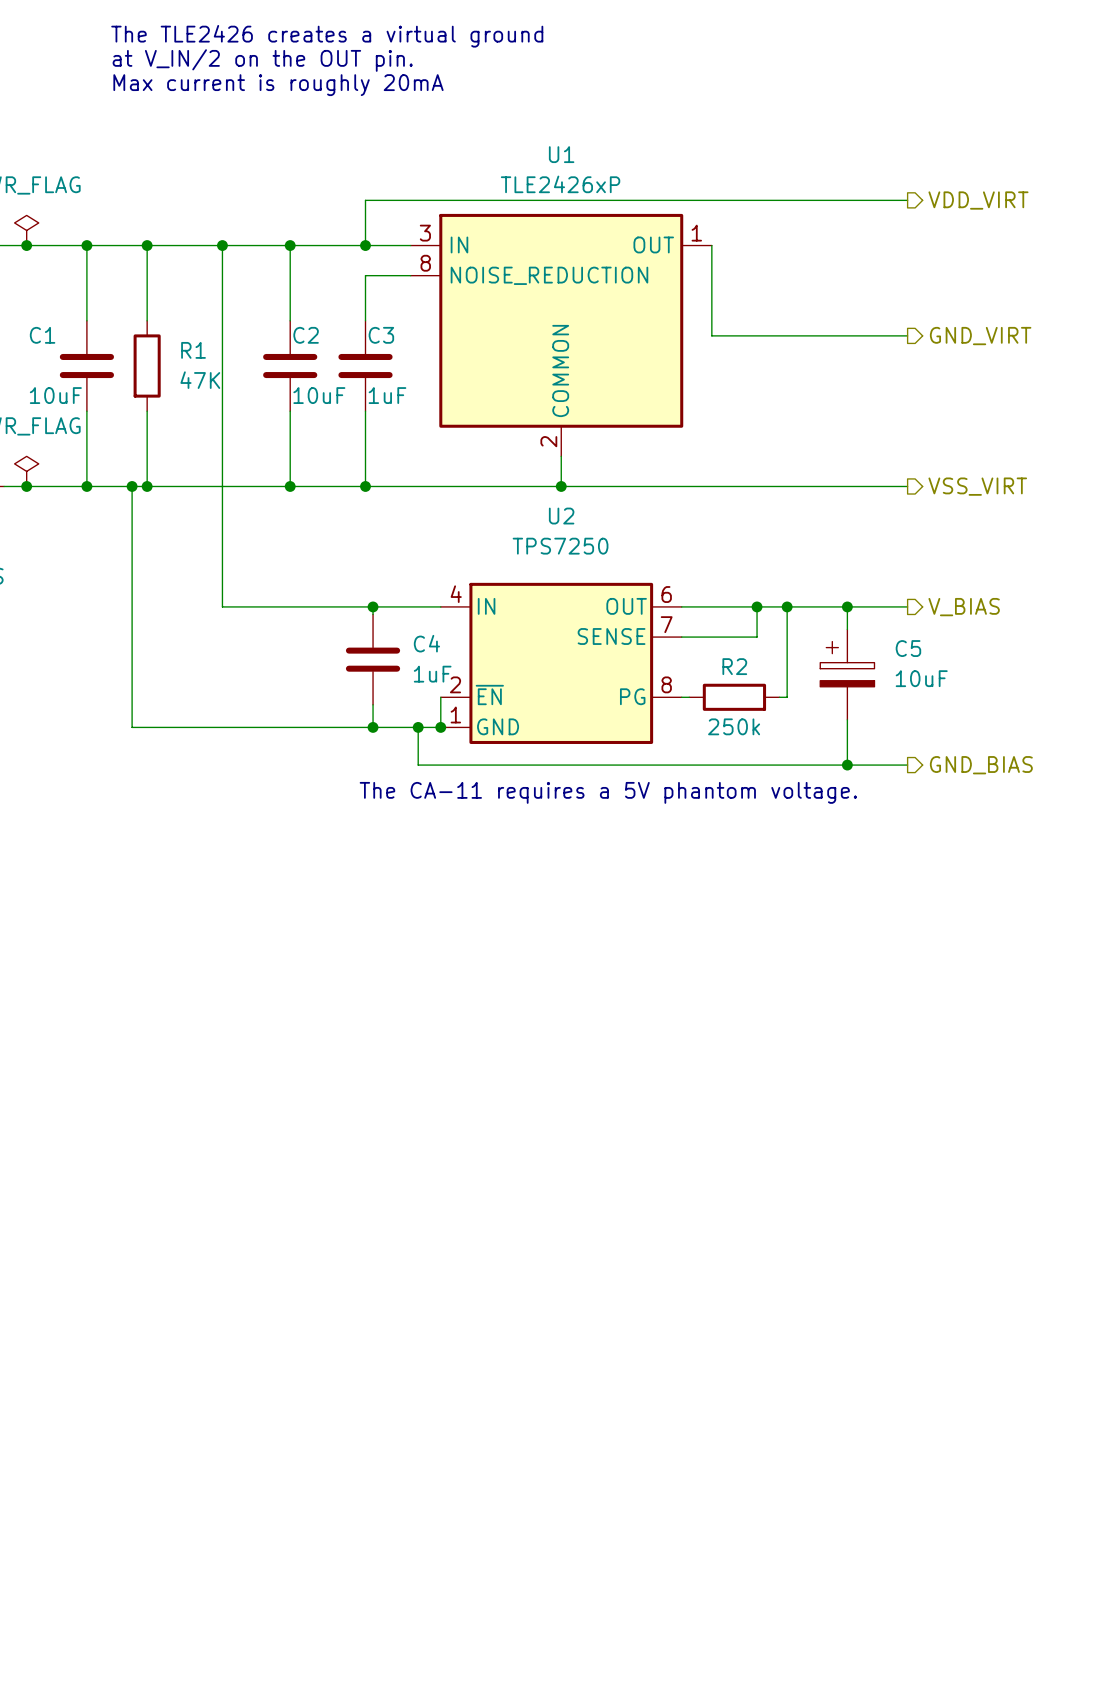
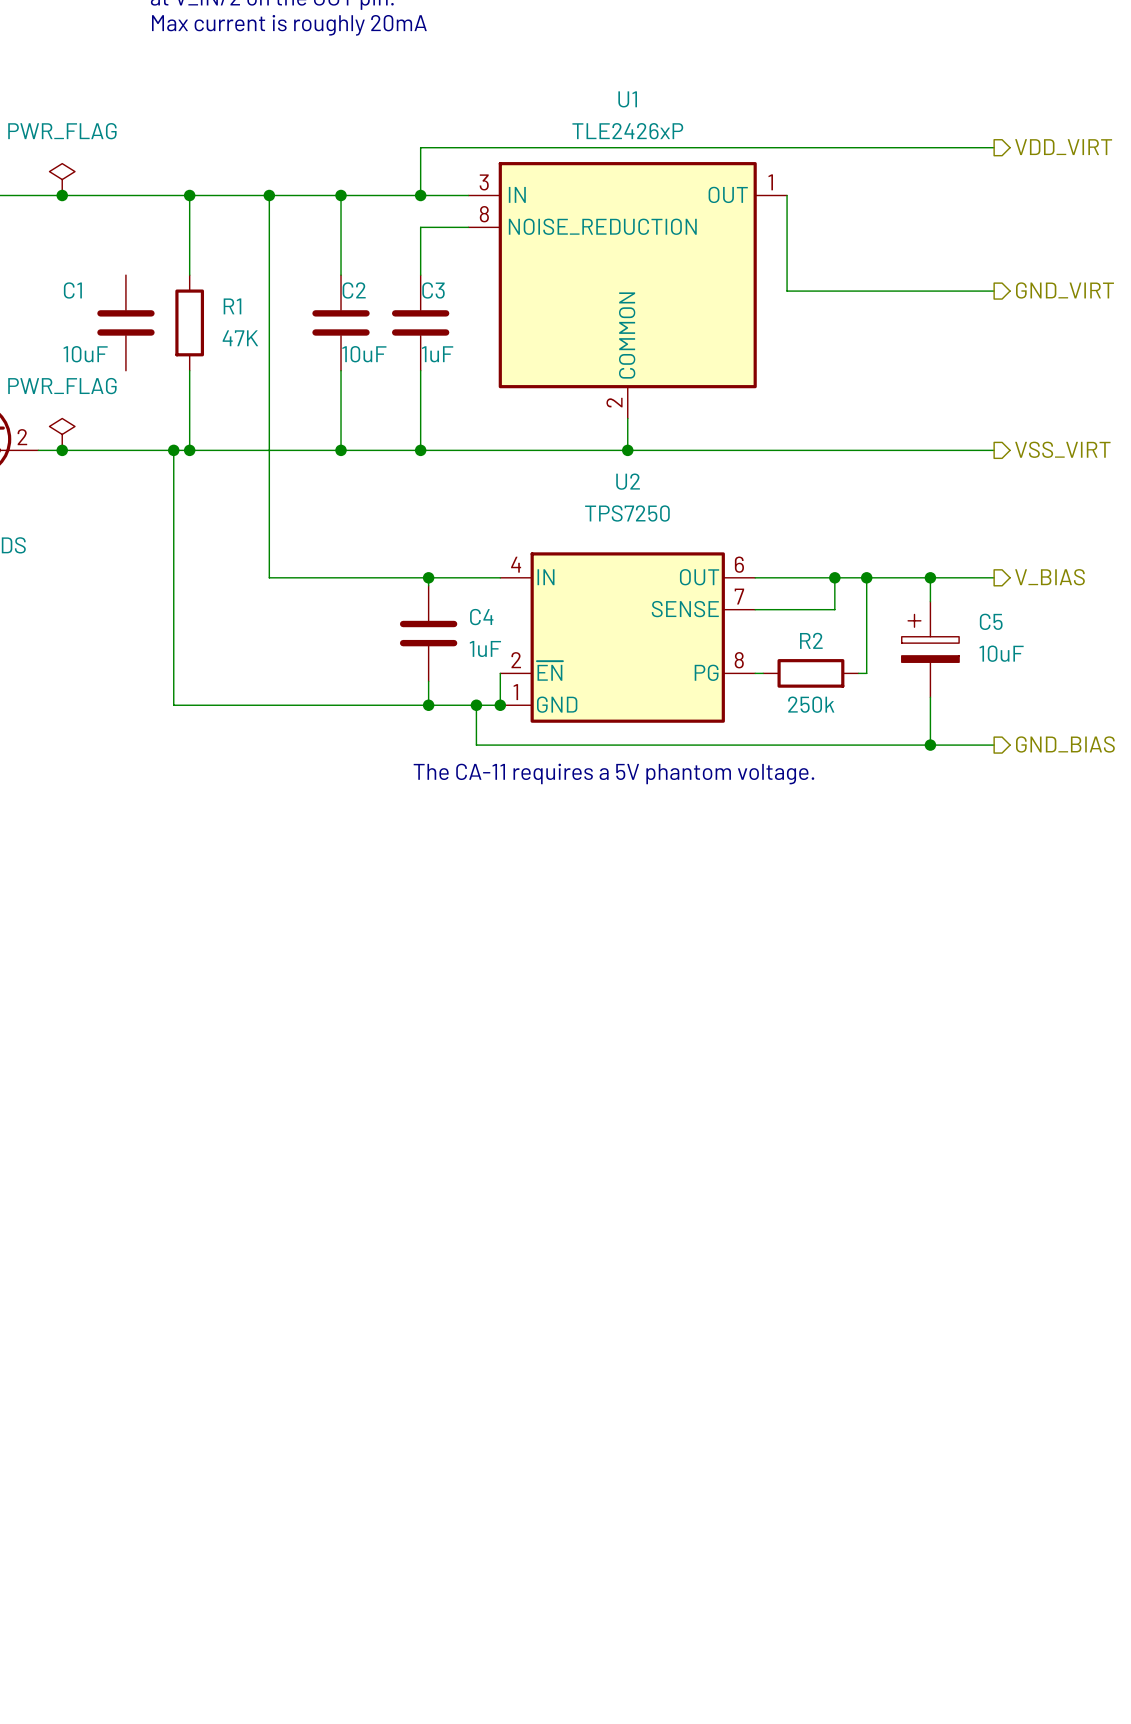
wire: (86, 245) (86, 320) -> none
junction: (86, 245) -> none
wire: (86, 411) (86, 486) -> none
junction: (86, 486) -> none

